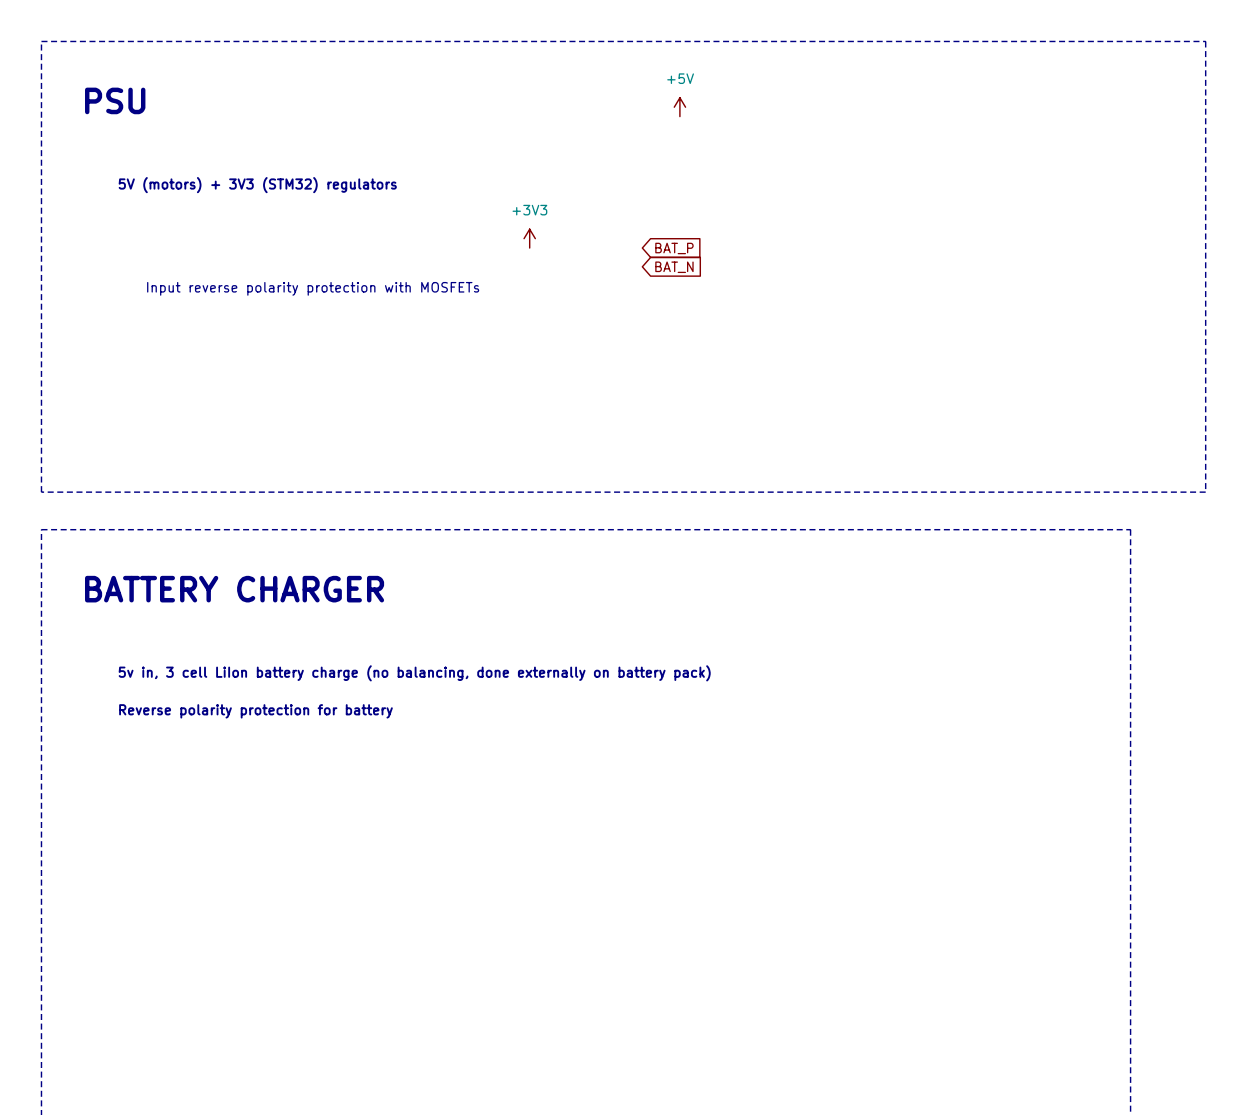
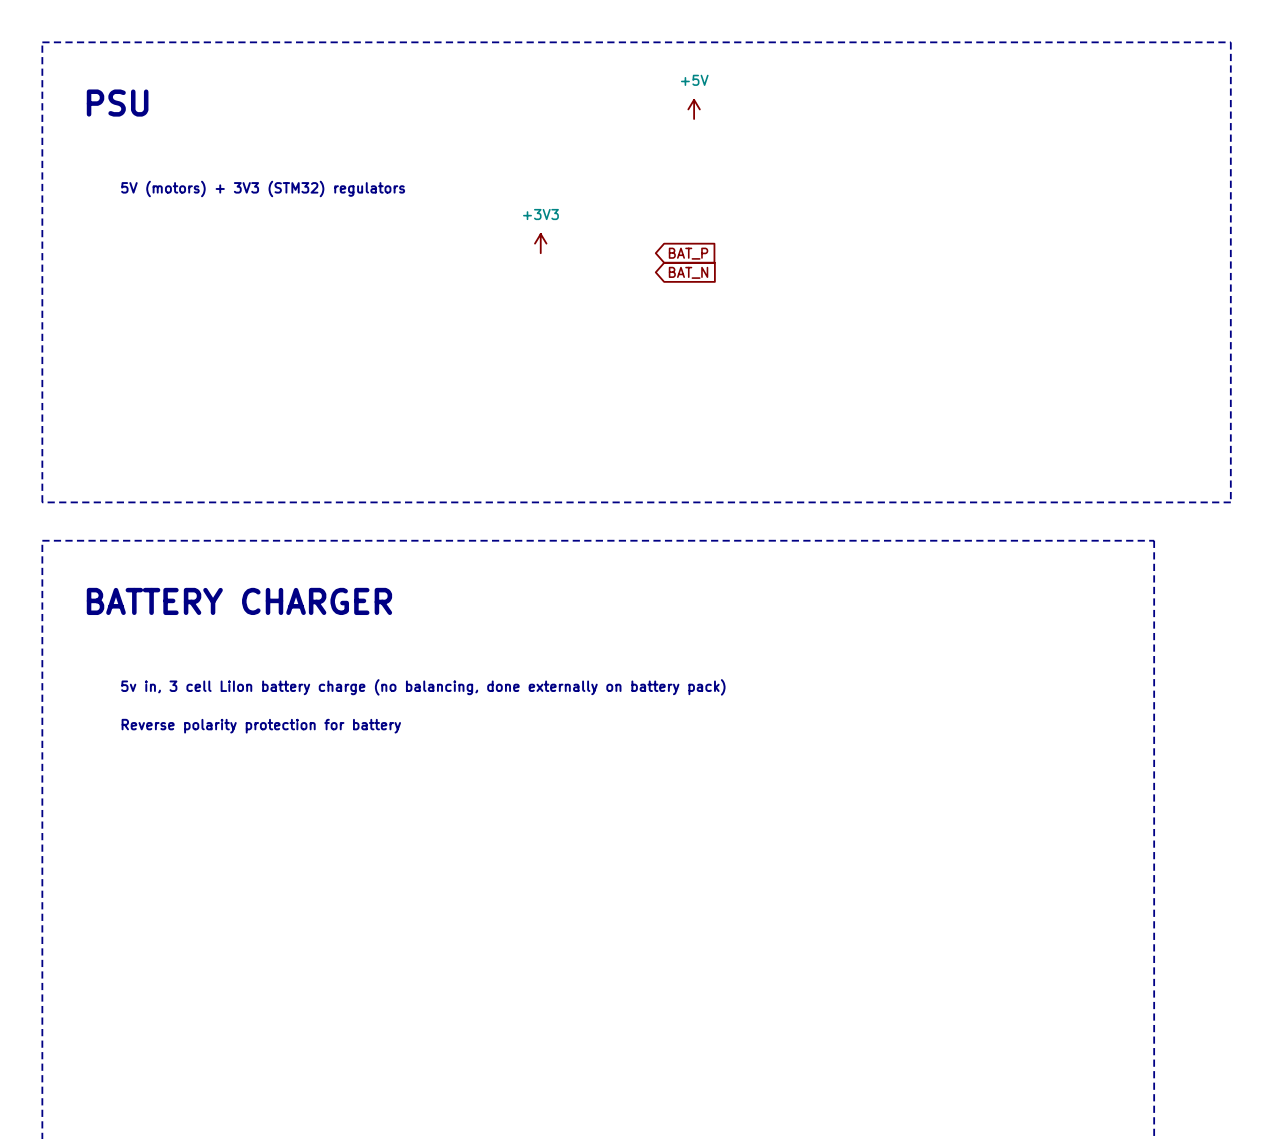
text: Input reverse polarity protection with MOSFETs (313, 288) -> none

